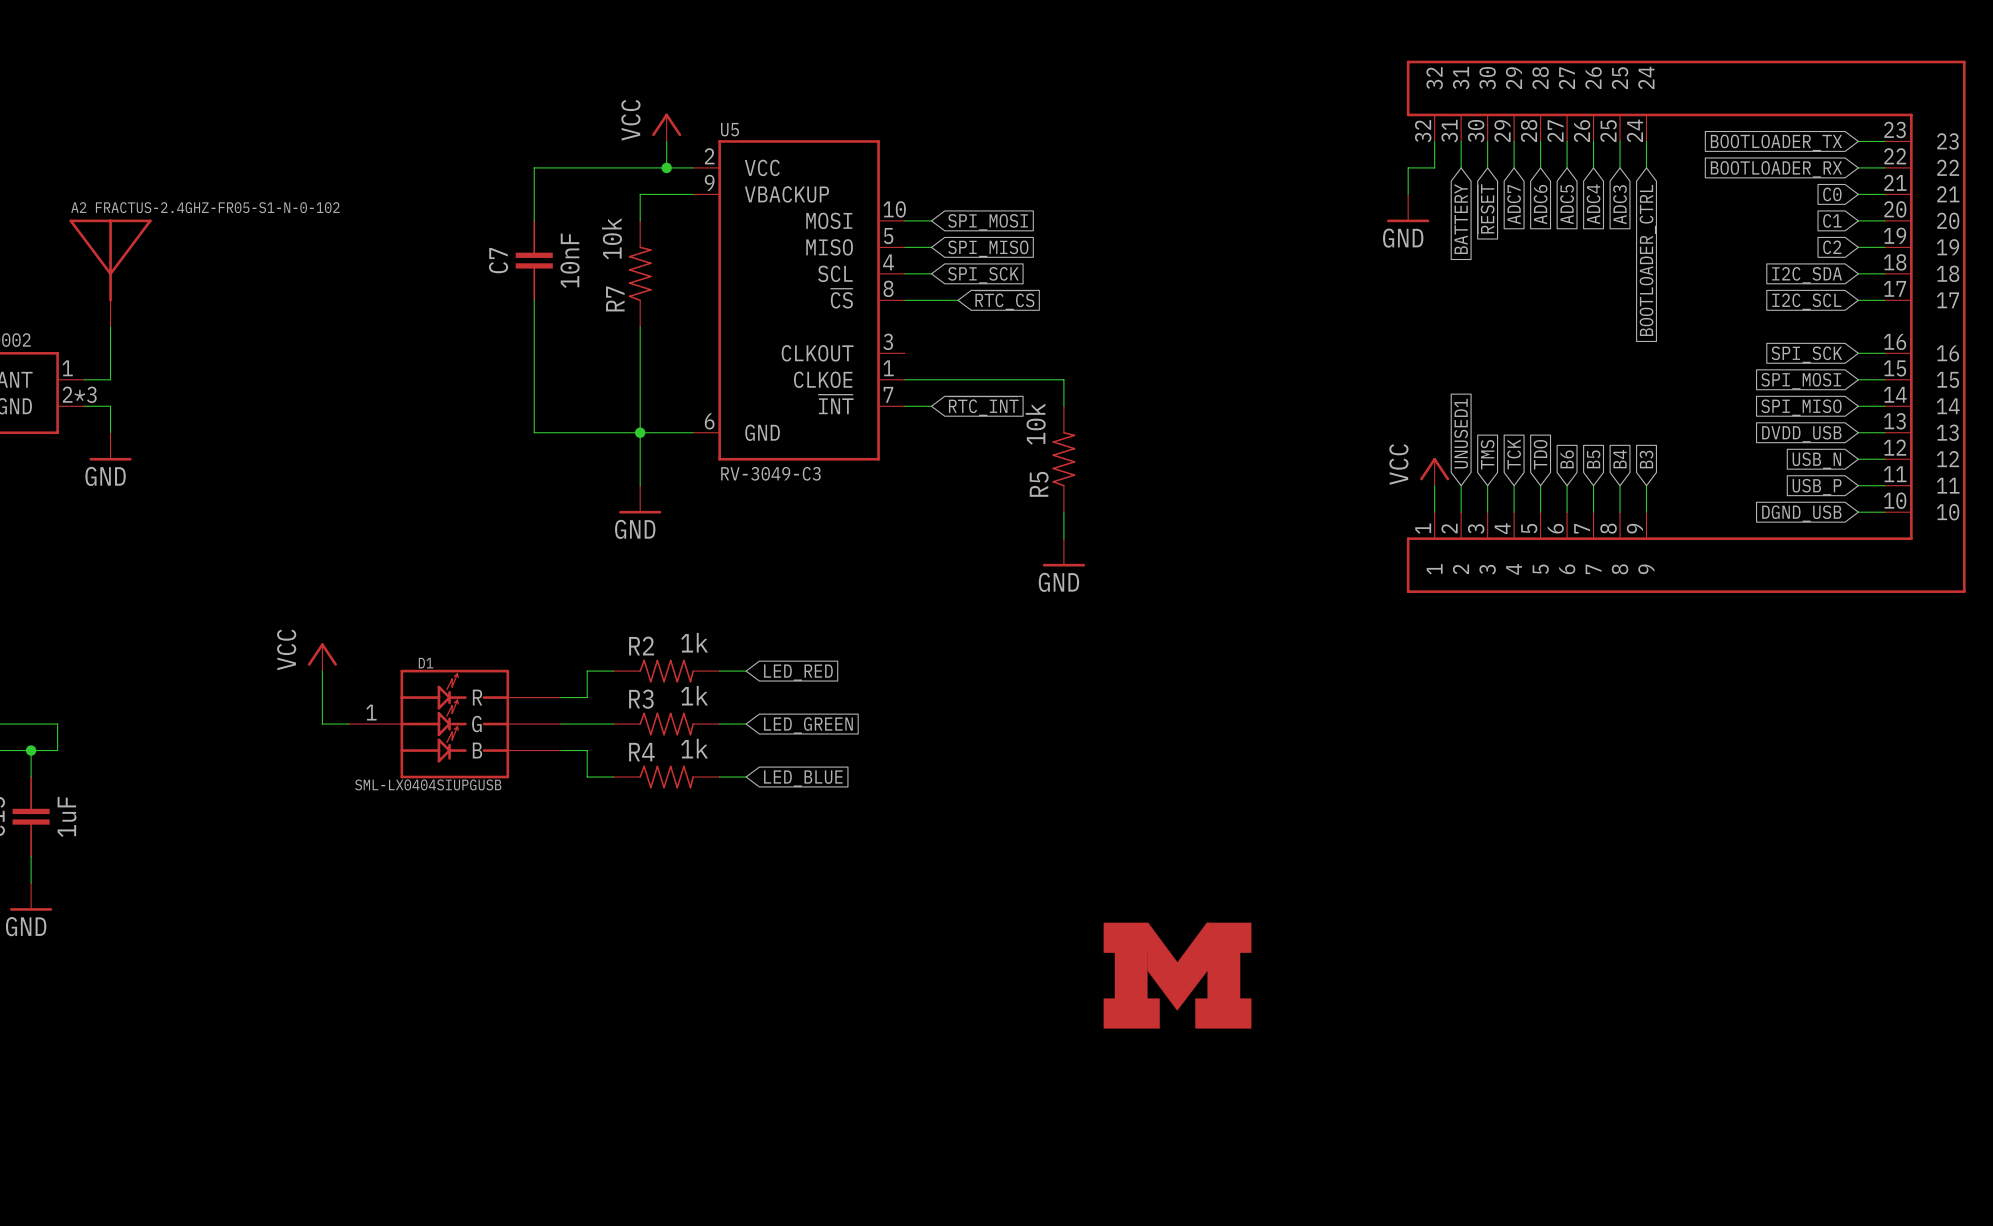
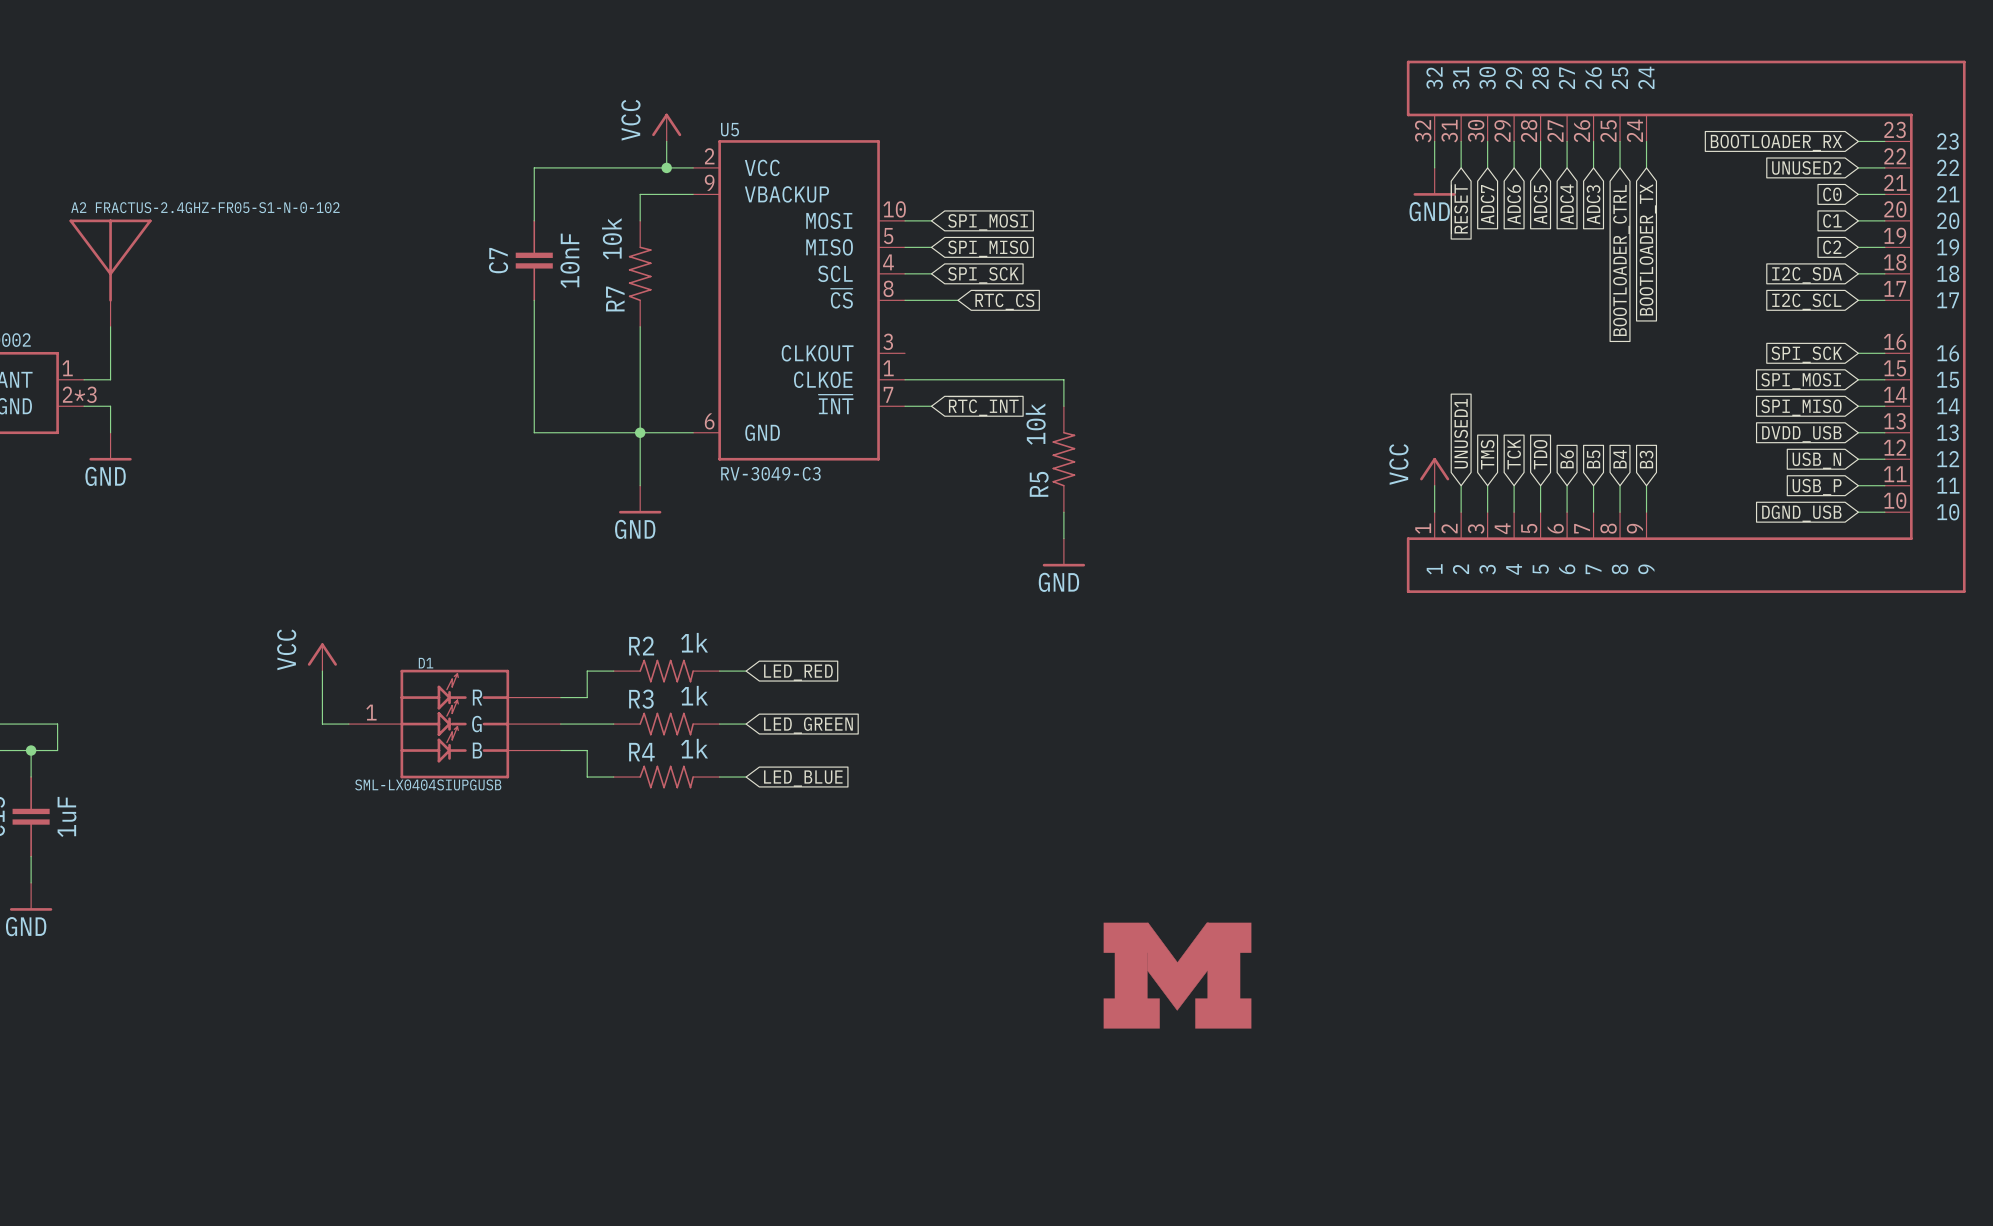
global label: BOOTLOADER_TX (1776, 142) -> BOOTLOADER_RX (1776, 142)
wire: (1434, 167) (1408, 167) (1408, 194) -> none
global label: BOOTLOADER_RX (1776, 169) -> UNUSED2 (1806, 167)
global label: ADC7 (1514, 204) -> ADC6 (1514, 204)
global label: ADC6 (1540, 204) -> ADC5 (1540, 204)
global label: ADC5 (1567, 204) -> ADC4 (1567, 204)
global label: ADC4 (1593, 204) -> ADC3 (1593, 204)
global label: ADC3 (1620, 204) -> BOOTLOADER_CTRL (1621, 260)
power symbol position: GND (1408, 208) -> GND (1434, 181)
global label: ~{RESET} (1486, 209) -> ADC7 (1487, 204)
global label: BATTERY (1461, 219) -> ~{RESET} (1459, 209)
global label: BOOTLOADER_CTRL (1648, 260) -> BOOTLOADER_TX (1648, 249)

